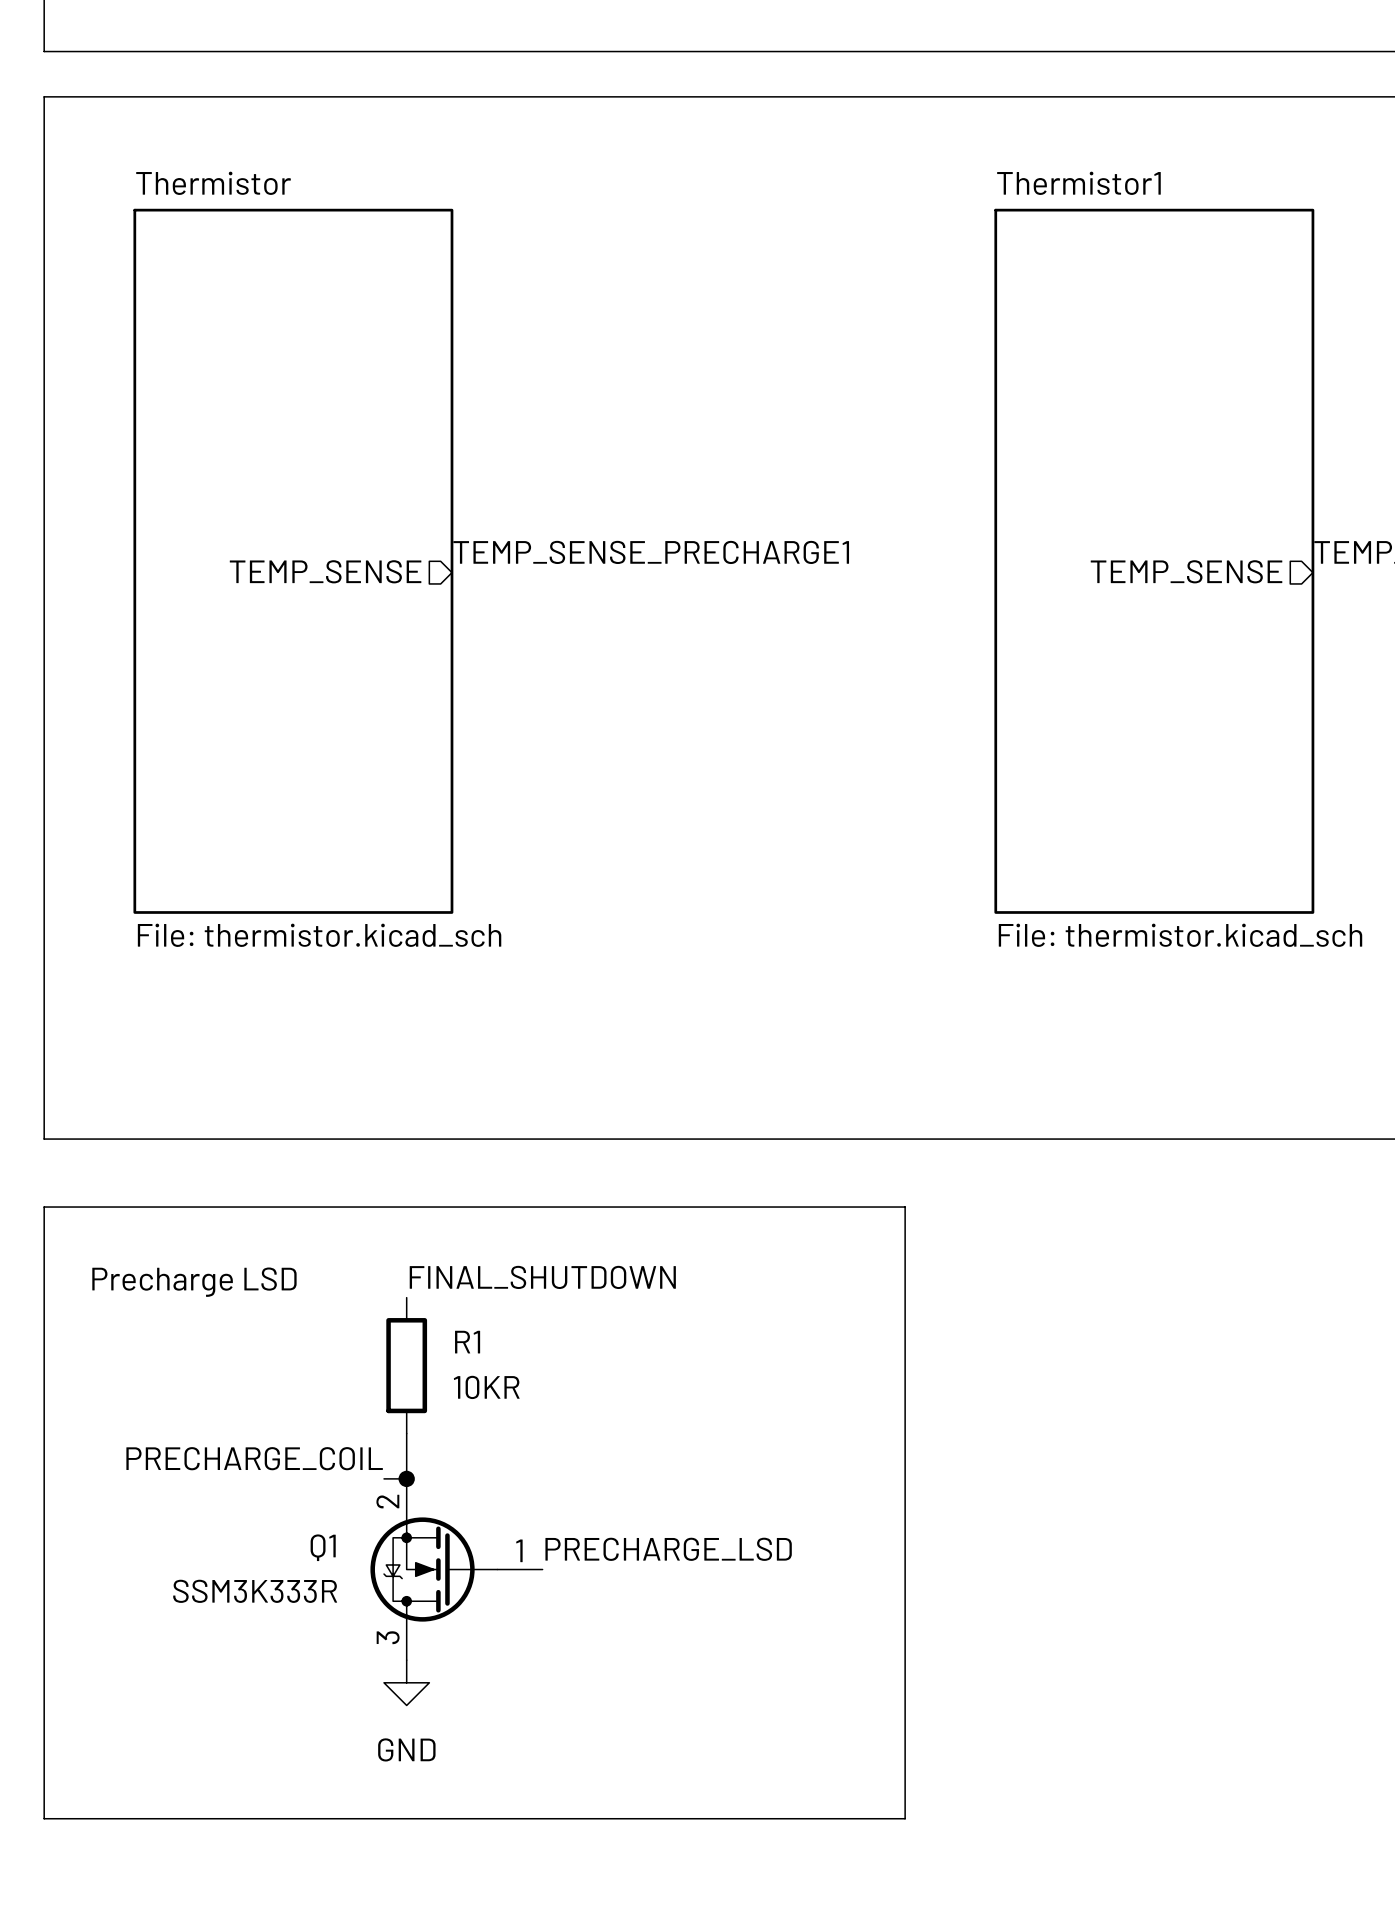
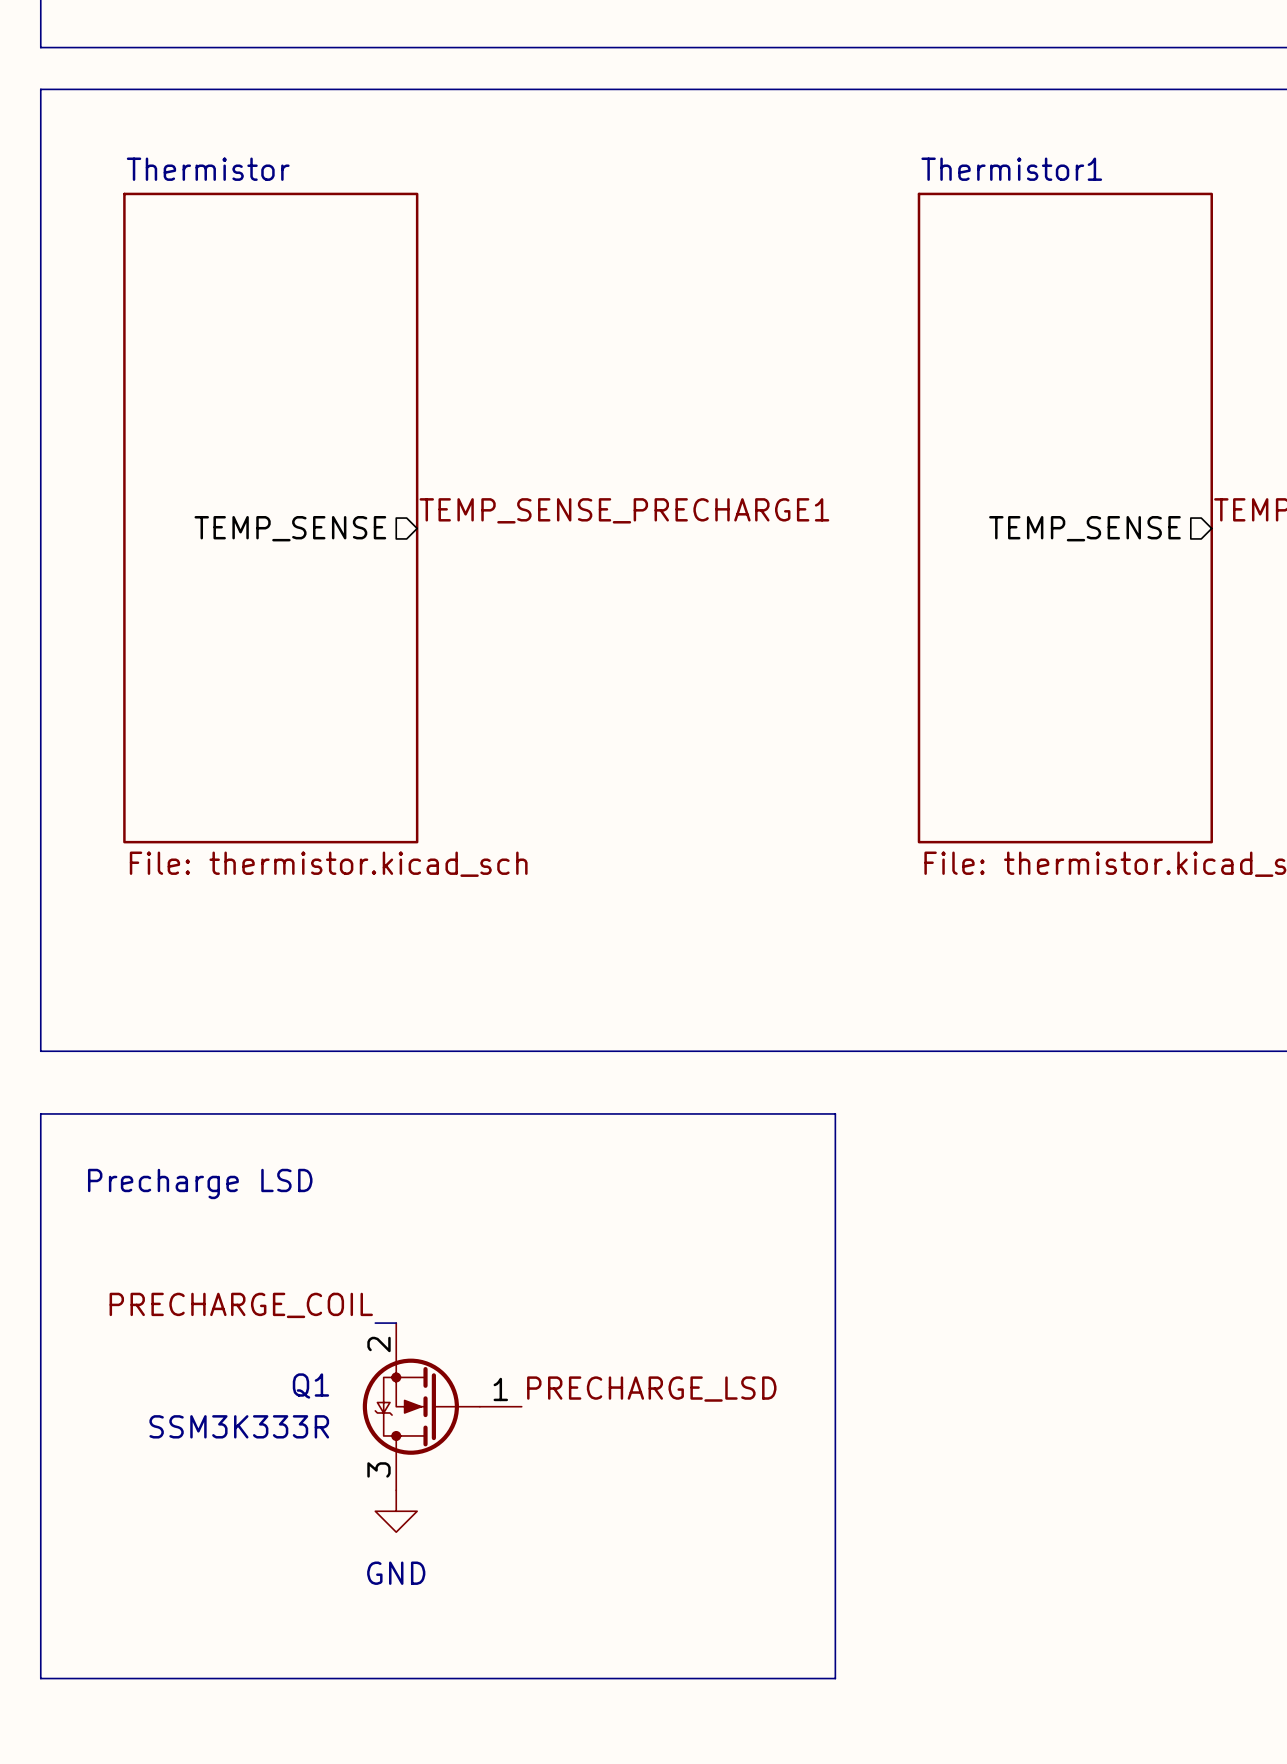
label: FINAL_SHUTDOWN (542, 1277) -> none
R1: 10KR (406, 1365) -> none
wire: (406, 1433) (406, 1478) (384, 1478) -> (375, 1323) (396, 1323)
label position: PRECHARGE_COIL (254, 1458) -> PRECHARGE_COIL (241, 1305)
junction: (406, 1478) -> none
label position: PRECHARGE_LSD (668, 1549) -> PRECHARGE_LSD (651, 1389)
Q1 position: (456, 1569) -> (442, 1406)
power symbol position: GND (406, 1682) -> GND (396, 1511)

